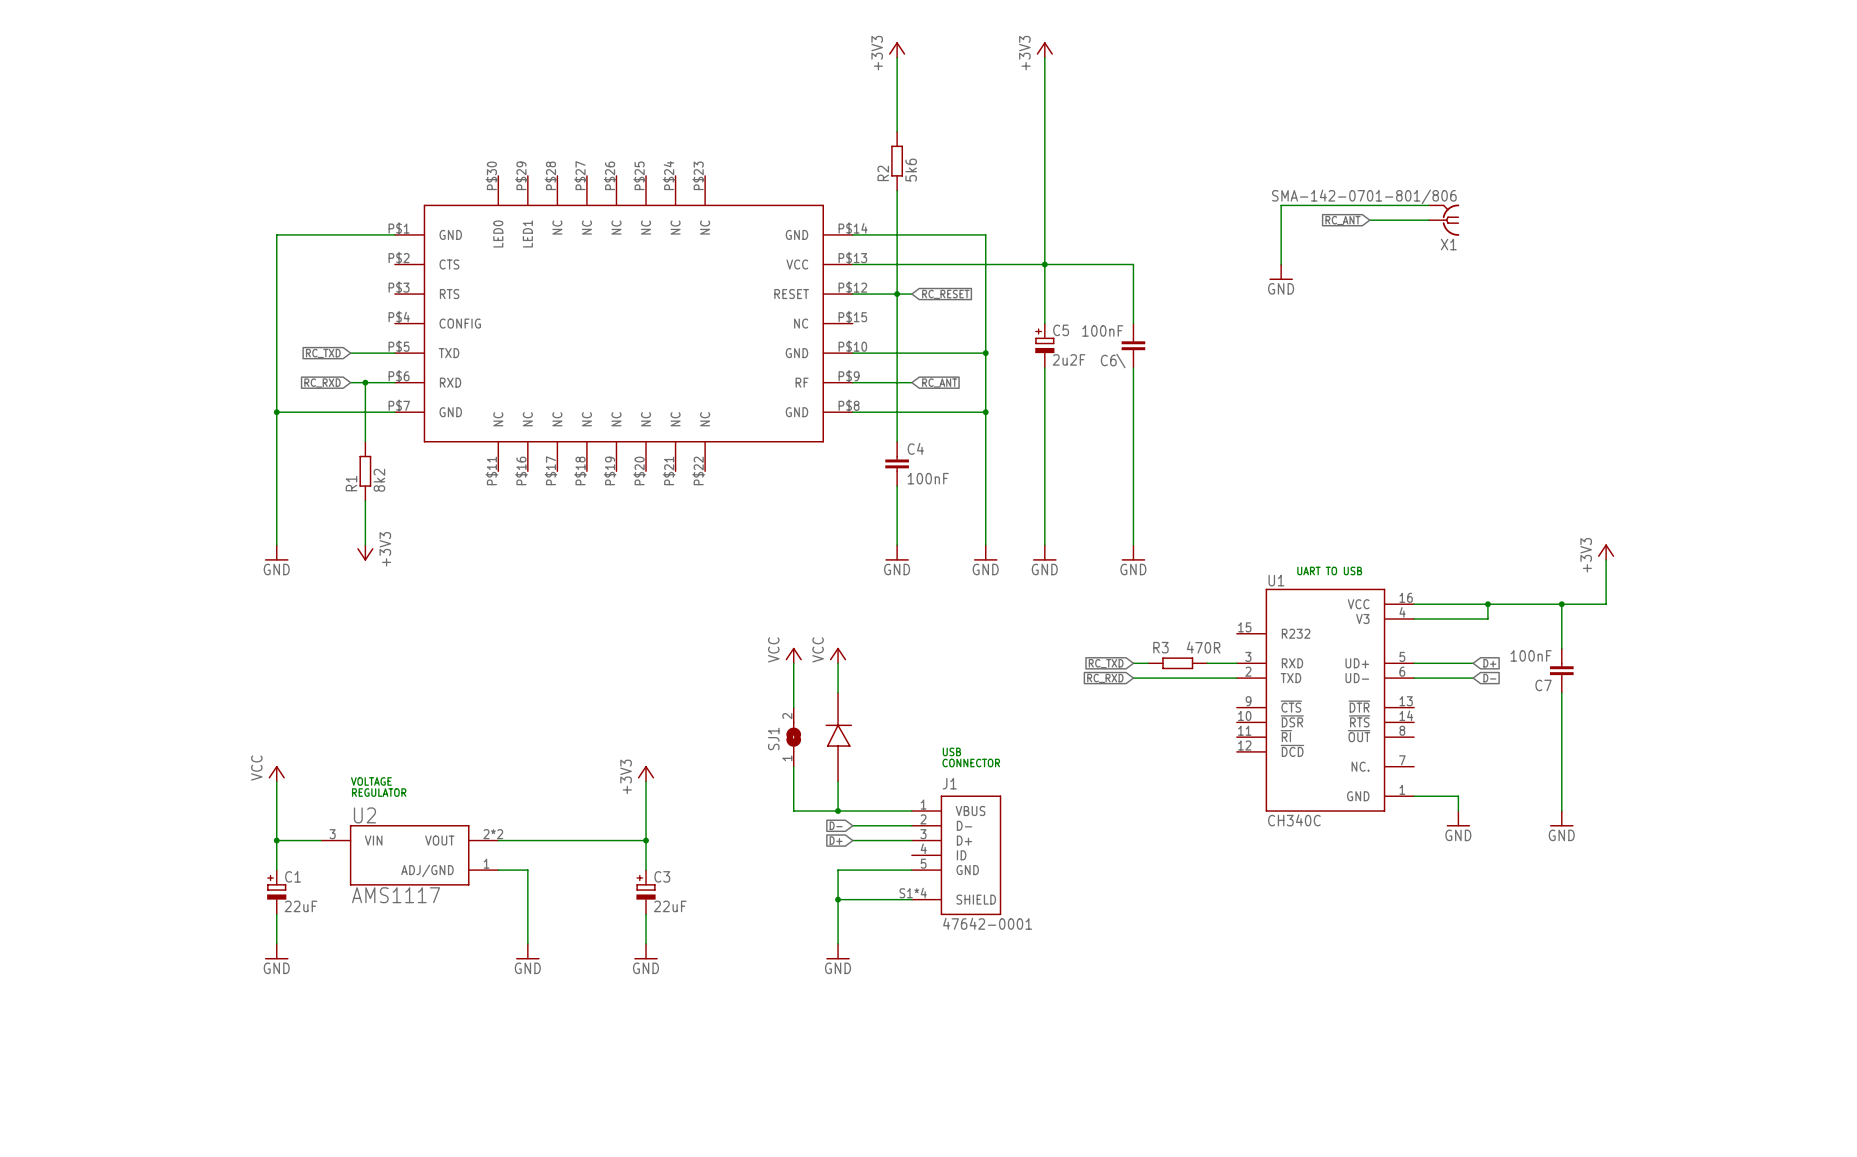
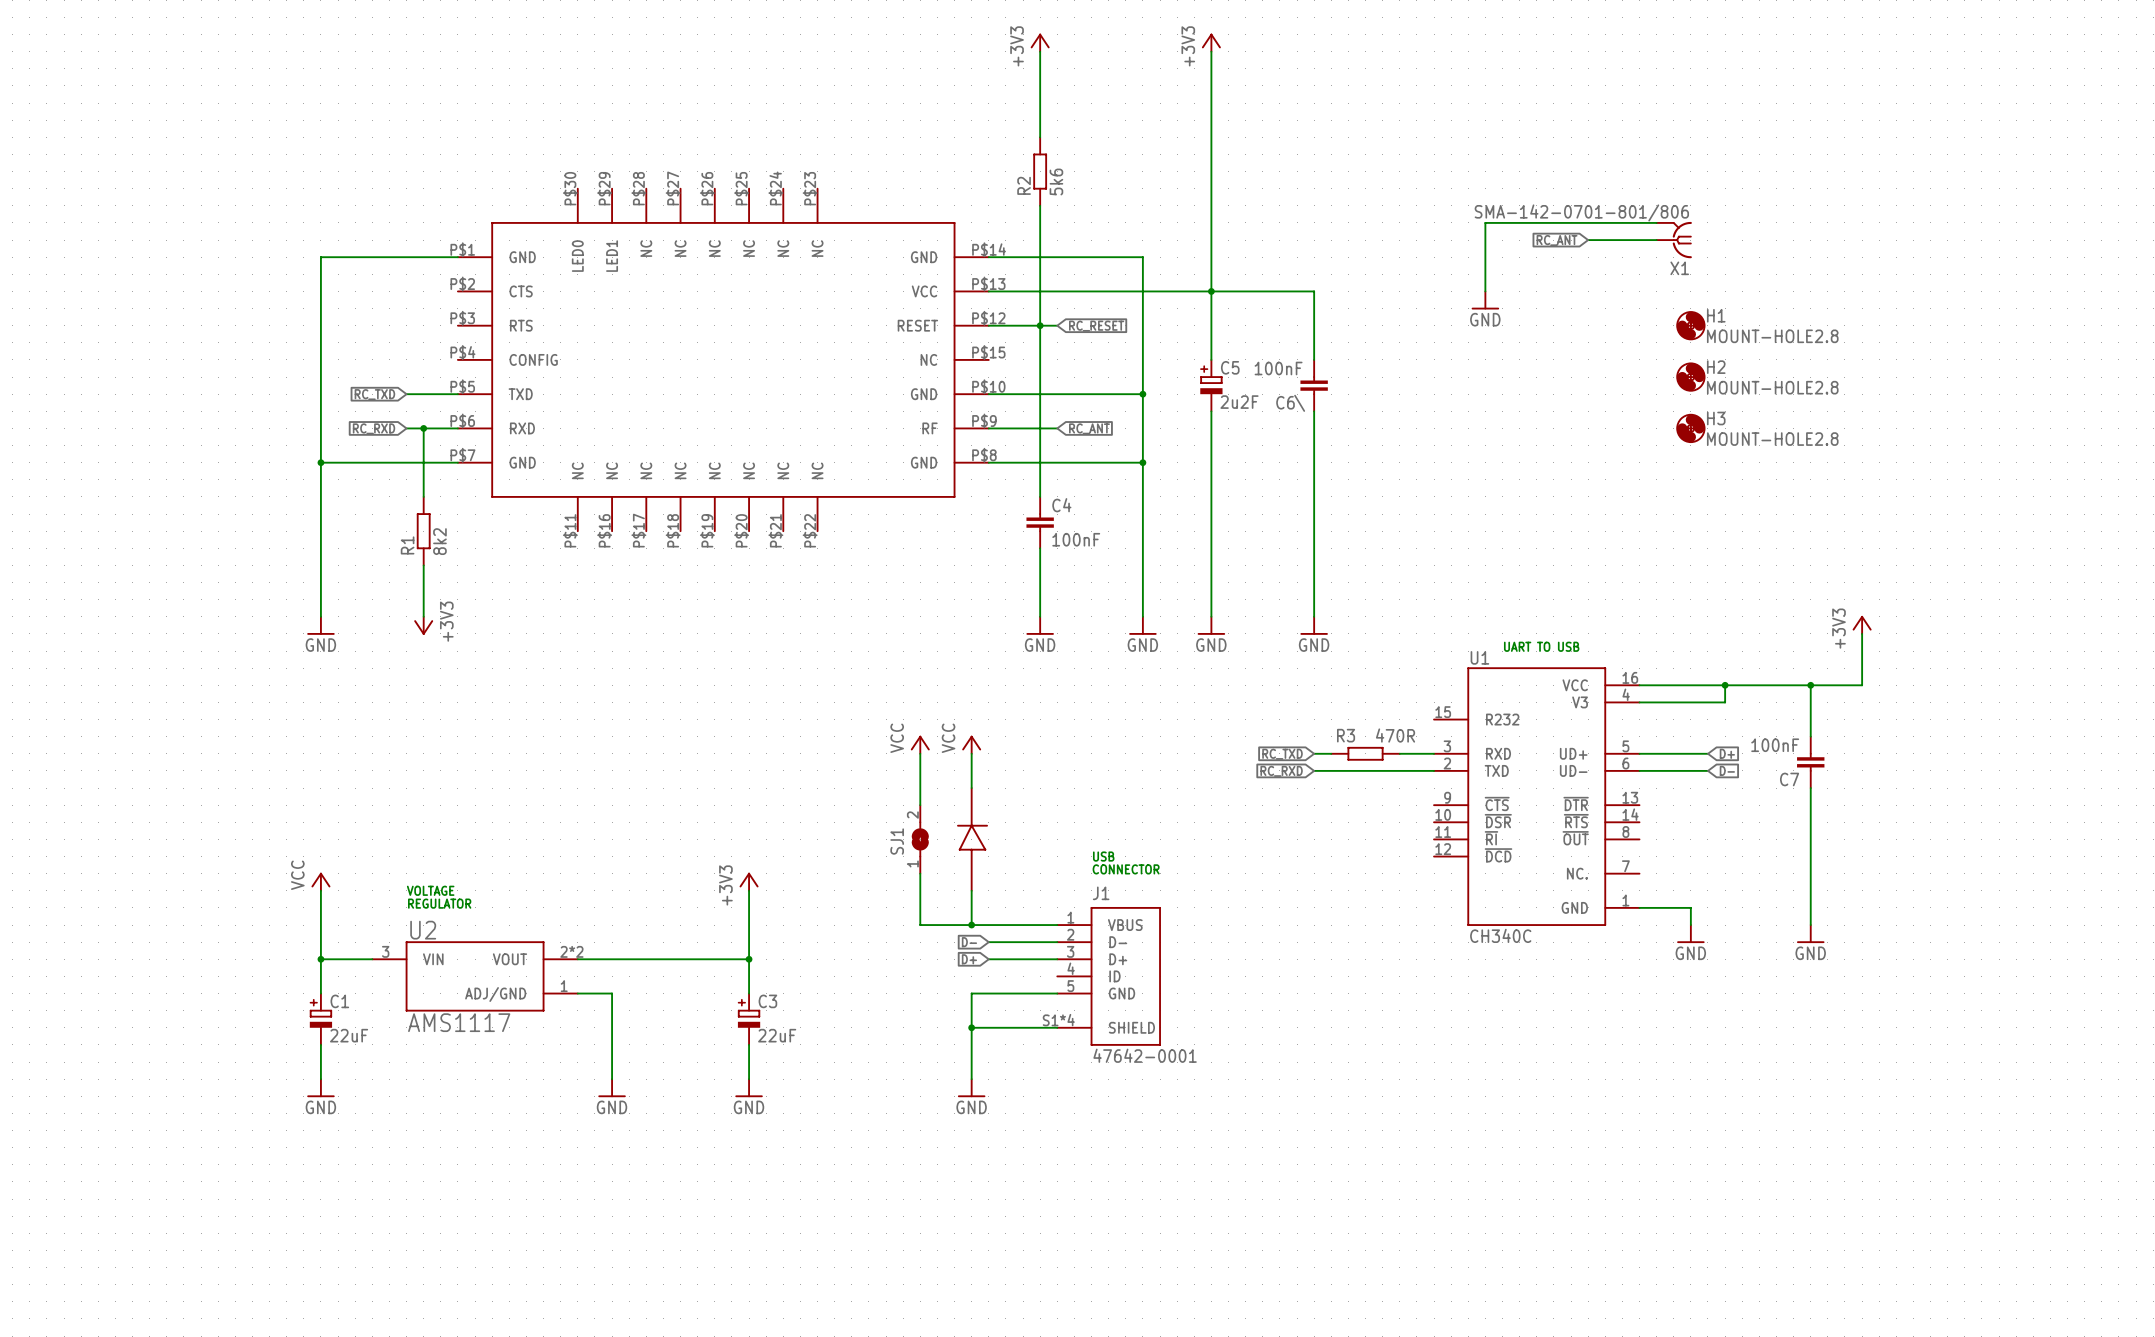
H1: none -> MOUNT-HOLE2.8 (1690, 325)
H2: none -> MOUNT-HOLE2.8 (1690, 377)
H3: none -> MOUNT-HOLE2.8 (1690, 428)

